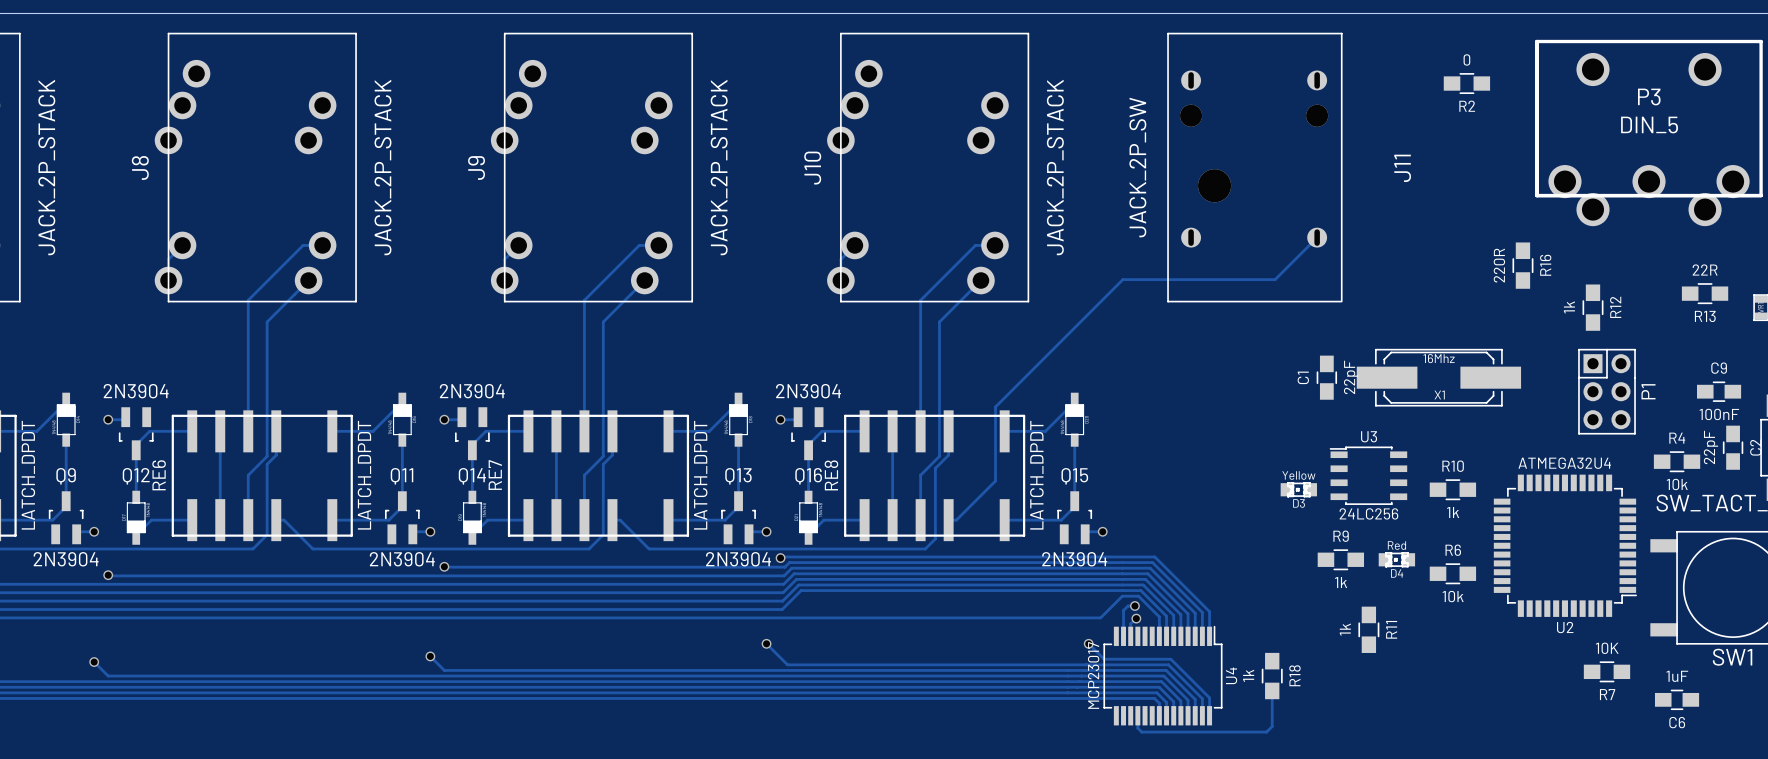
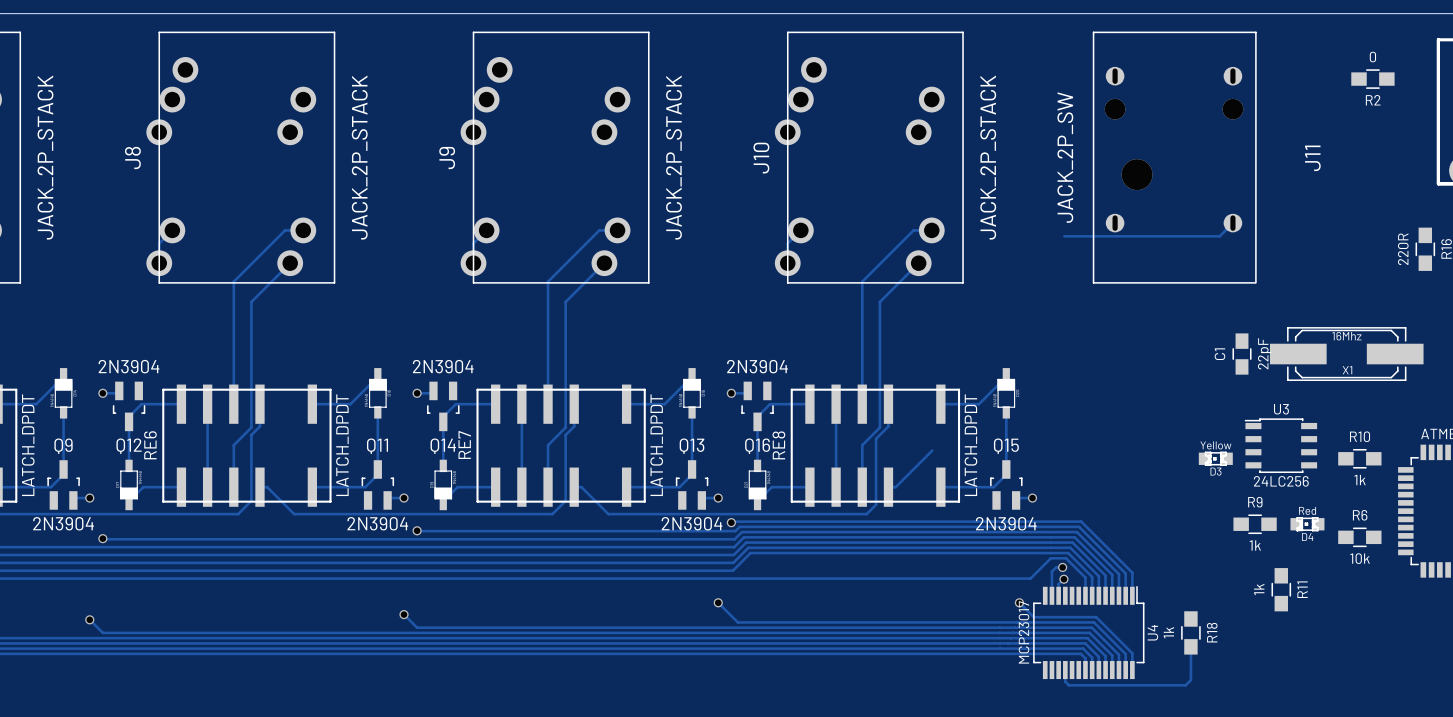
track: (1303, 251) (1275, 279) (1122, 279) (995, 406) (995, 481) -> (1219, 236) (1064, 236)

